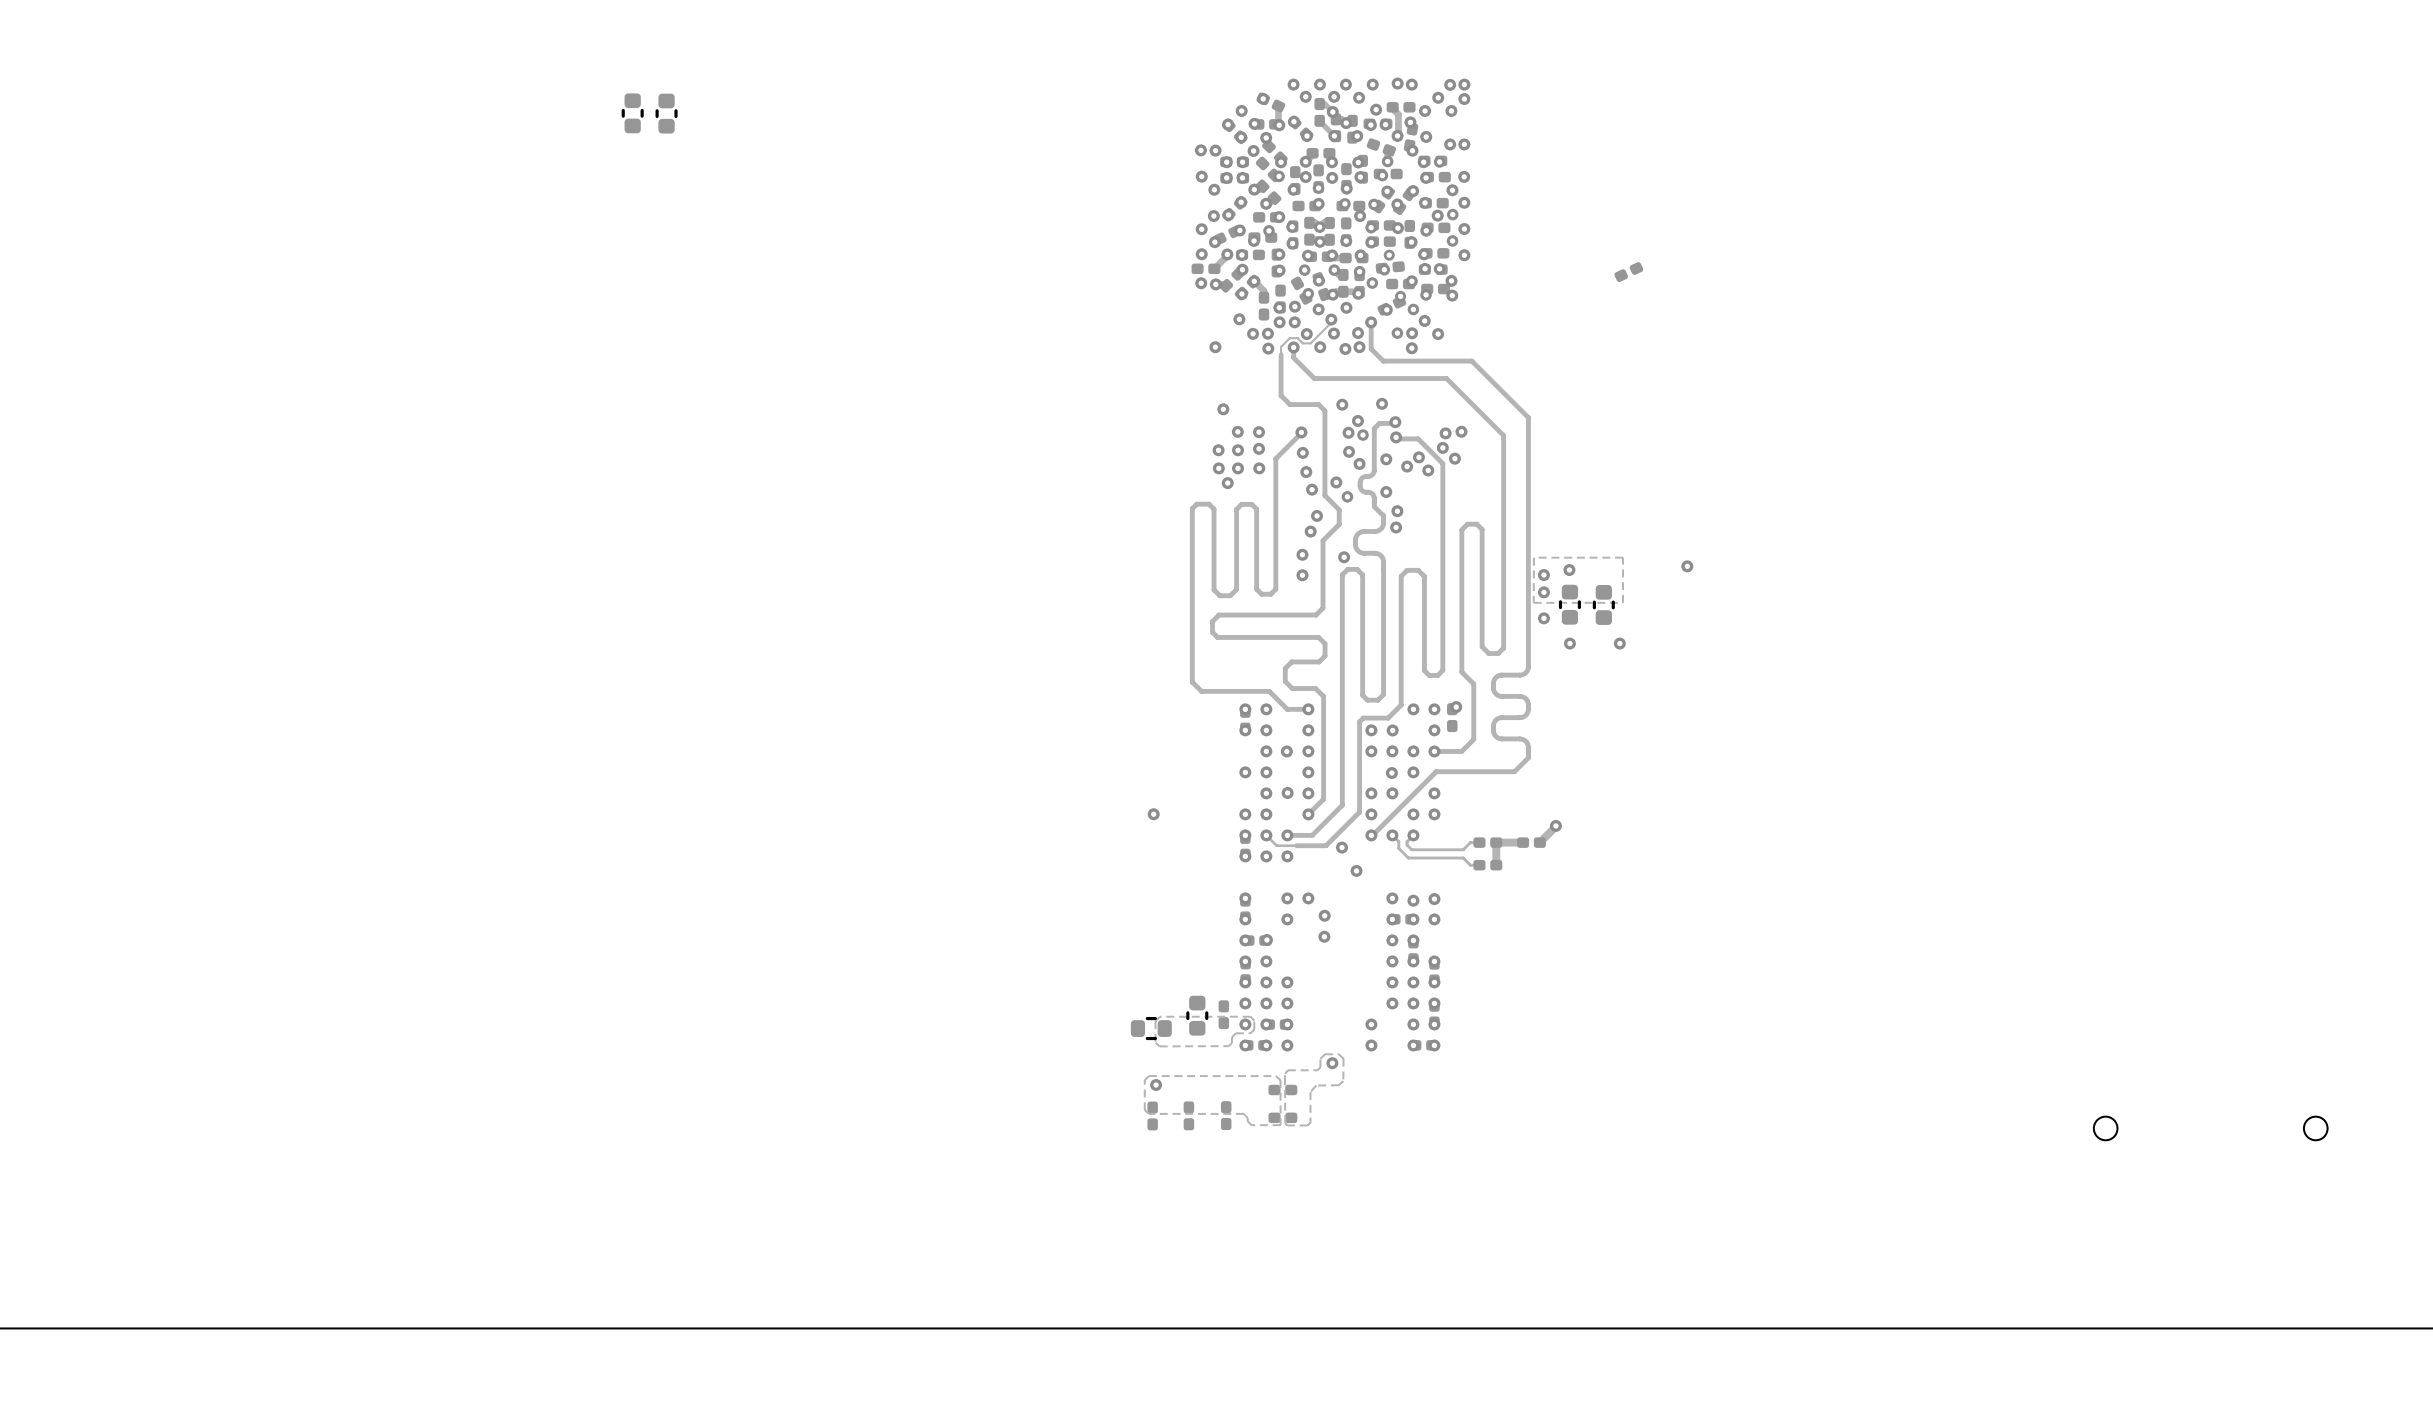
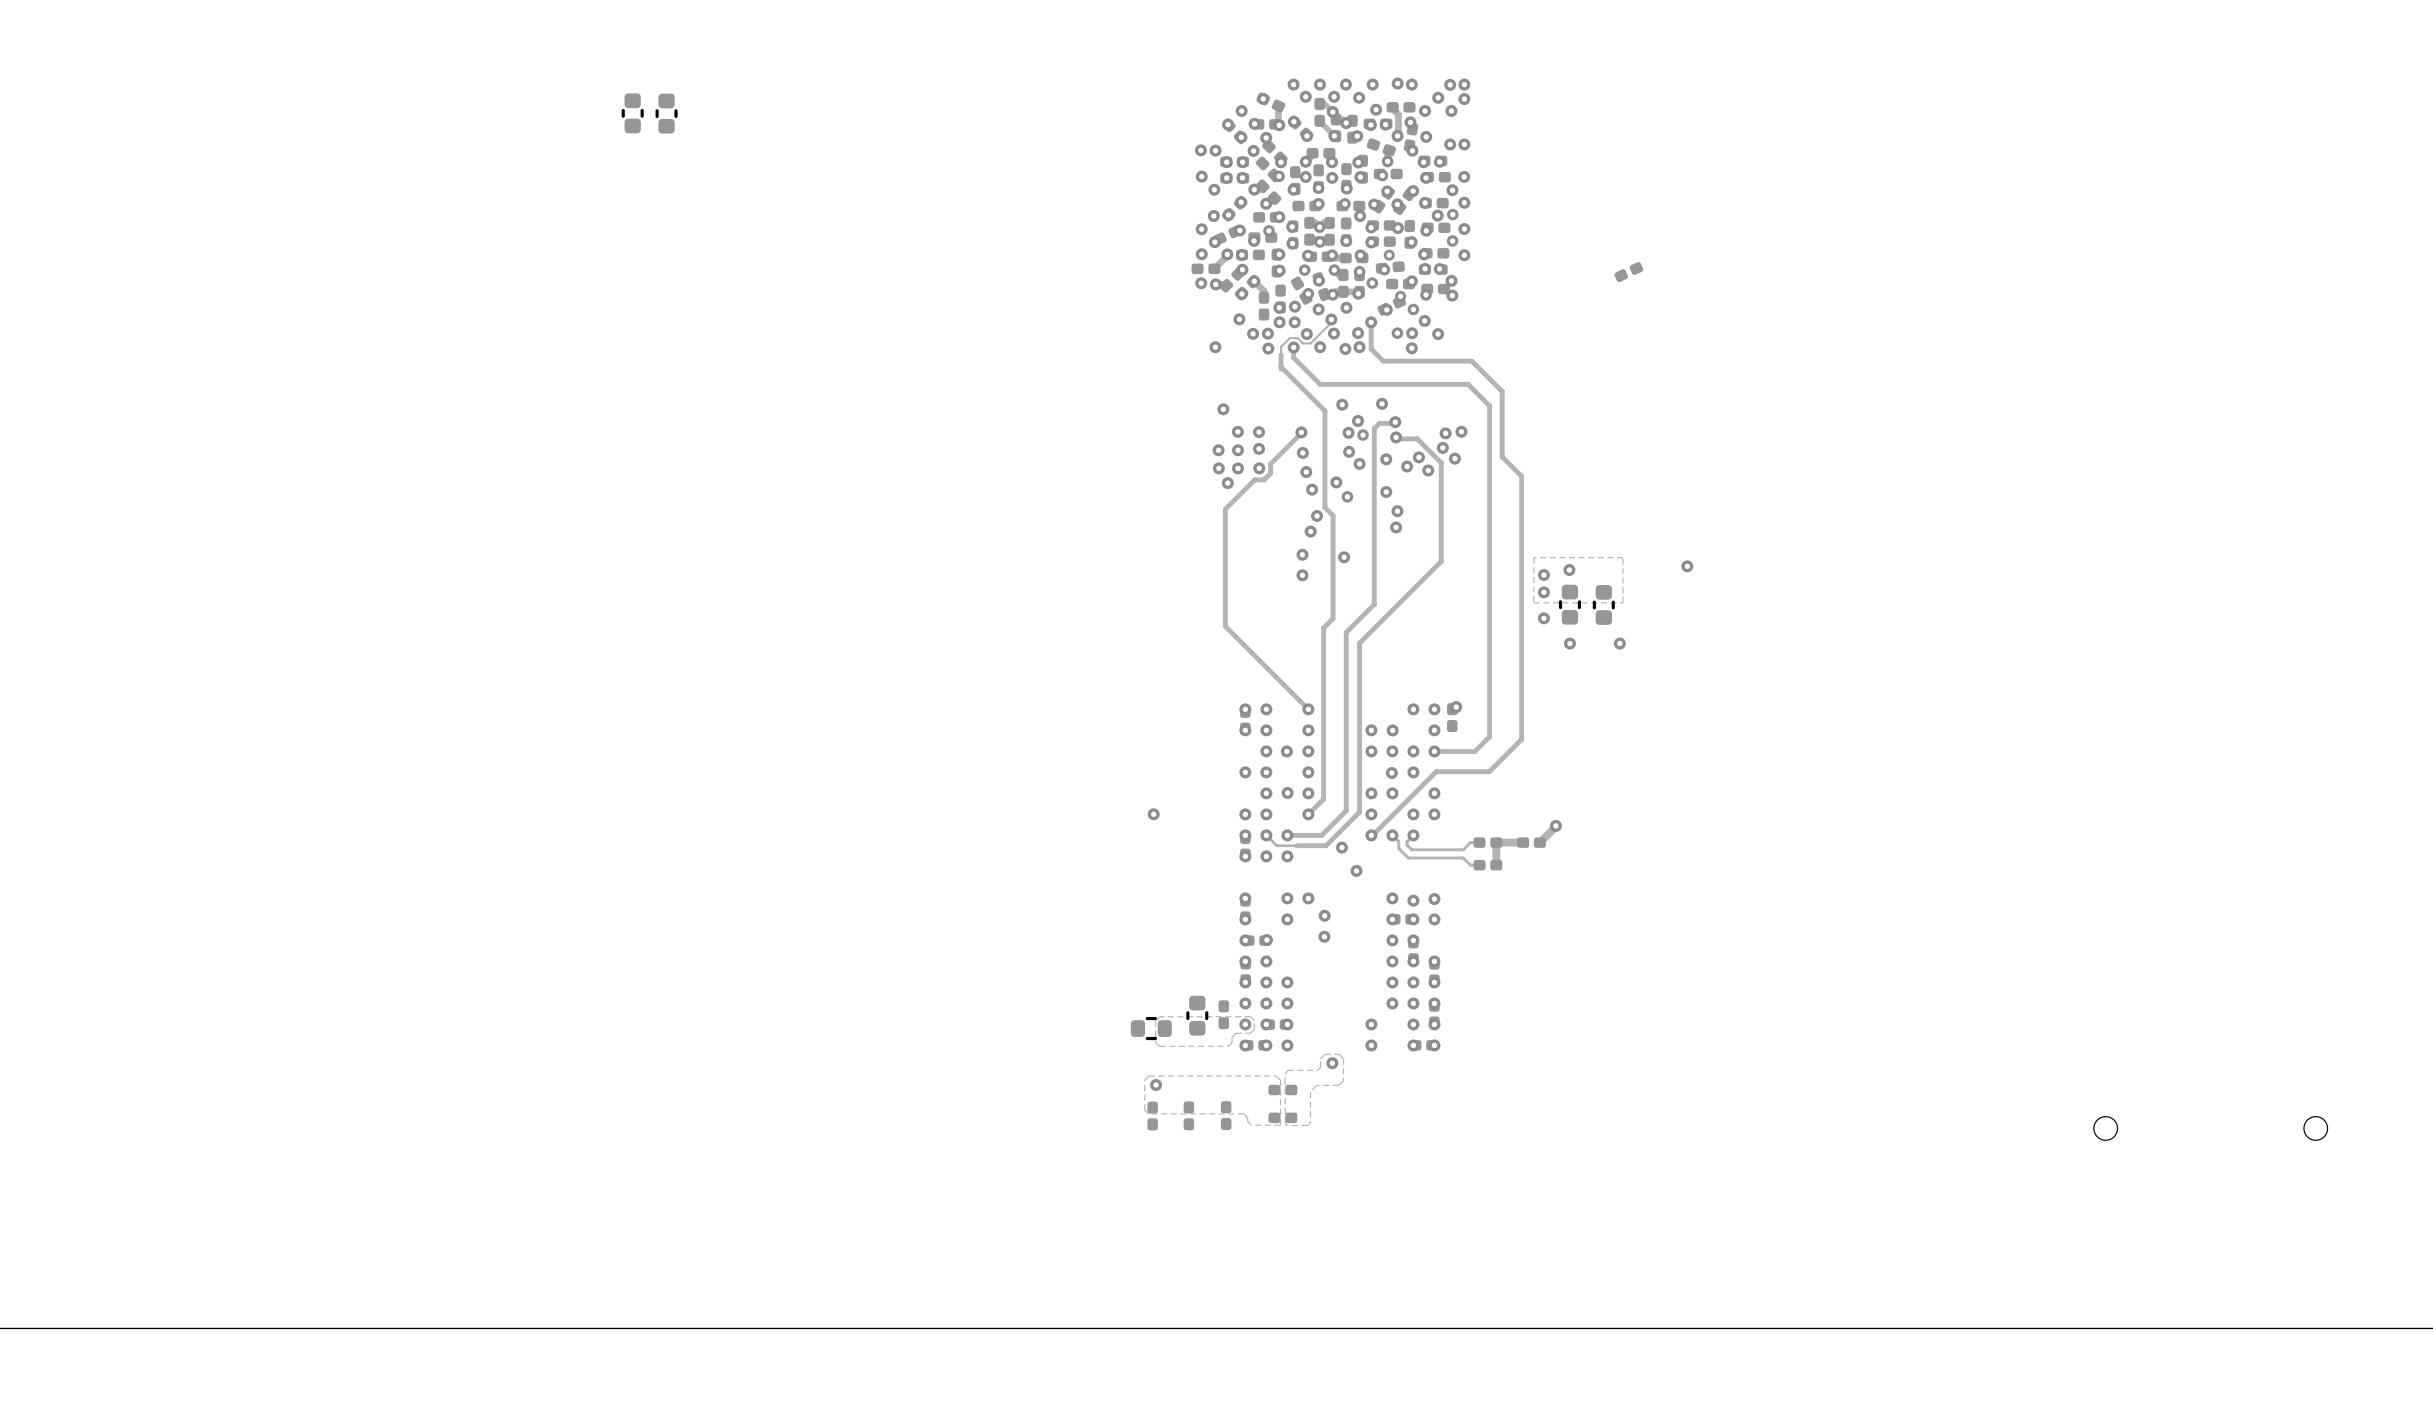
track: (1281, 369) (1281, 395) (1289, 404) (1318, 404) -> (1281, 367) (1318, 404)
track: (1314, 378) (1446, 378) (1503, 435) (1503, 648) (1498, 653) (1488, 653) (1482, 646) (1482, 529) (1476, 524) (1467, 524) (1461, 529) (1461, 672) (1473, 684) (1473, 739) (1461, 751) -> (1314, 378) (1320, 384) (1468, 384) (1489, 405) (1489, 736) (1474, 751) (1461, 751)
track: (1502, 391) (1528, 417) (1528, 666) (1526, 671) (1522, 674) (1497, 676) (1493, 680) (1493, 688) (1495, 693) (1500, 696) (1524, 697) (1527, 702) (1528, 709) (1526, 714) (1522, 717) (1497, 718) (1493, 723) (1493, 731) (1499, 738) (1525, 740) (1528, 745) (1528, 757) (1514, 771) (1489, 771) -> (1502, 391) (1502, 456) (1521, 476) (1521, 739) (1489, 771)
track: (1417, 438) (1442, 463) (1442, 670) (1437, 675) (1429, 675) (1424, 670) (1424, 576) (1418, 570) (1407, 570) (1401, 576) (1401, 705) (1388, 718) (1363, 718) (1359, 721) -> (1417, 438) (1441, 462) (1441, 561) (1359, 643) (1359, 721)
track: (1275, 458) (1275, 589) (1270, 594) (1261, 594) (1256, 589) (1256, 509) (1251, 504) (1241, 504) (1236, 509) (1236, 589) (1230, 595) (1219, 595) (1214, 589) (1214, 509) (1208, 504) (1196, 504) (1192, 508) (1192, 682) (1201, 691) (1269, 691) (1287, 709) (1308, 709) -> (1275, 458) (1270, 464) (1270, 473) (1264, 479) (1254, 479) (1225, 509) (1225, 626) (1308, 709)
track: (1374, 470) (1371, 475) (1363, 477) (1360, 482) (1361, 490) (1371, 493) (1374, 498) -> (1374, 470) (1374, 498)
track: (1324, 495) (1339, 509) (1339, 524) (1323, 540) (1323, 608) (1316, 615) (1219, 615) (1212, 621) (1212, 632) (1217, 637) (1318, 637) (1325, 643) (1325, 656) (1319, 661) (1291, 661) (1285, 668) (1285, 681) (1292, 688) (1315, 688) (1323, 696) -> (1324, 495) (1324, 507) (1333, 515) (1333, 618) (1323, 628) (1323, 696)
track: (1374, 506) (1383, 515) (1382, 527) (1377, 531) (1359, 532) (1356, 536) (1355, 544) (1359, 552) (1378, 553) (1383, 560) (1383, 694) (1377, 700) (1367, 700) (1362, 695) (1362, 574) (1357, 569) (1347, 569) (1342, 574) (1342, 805) (1312, 835) -> (1374, 506) (1374, 604) (1346, 632) (1346, 810) (1321, 835) (1312, 835)

